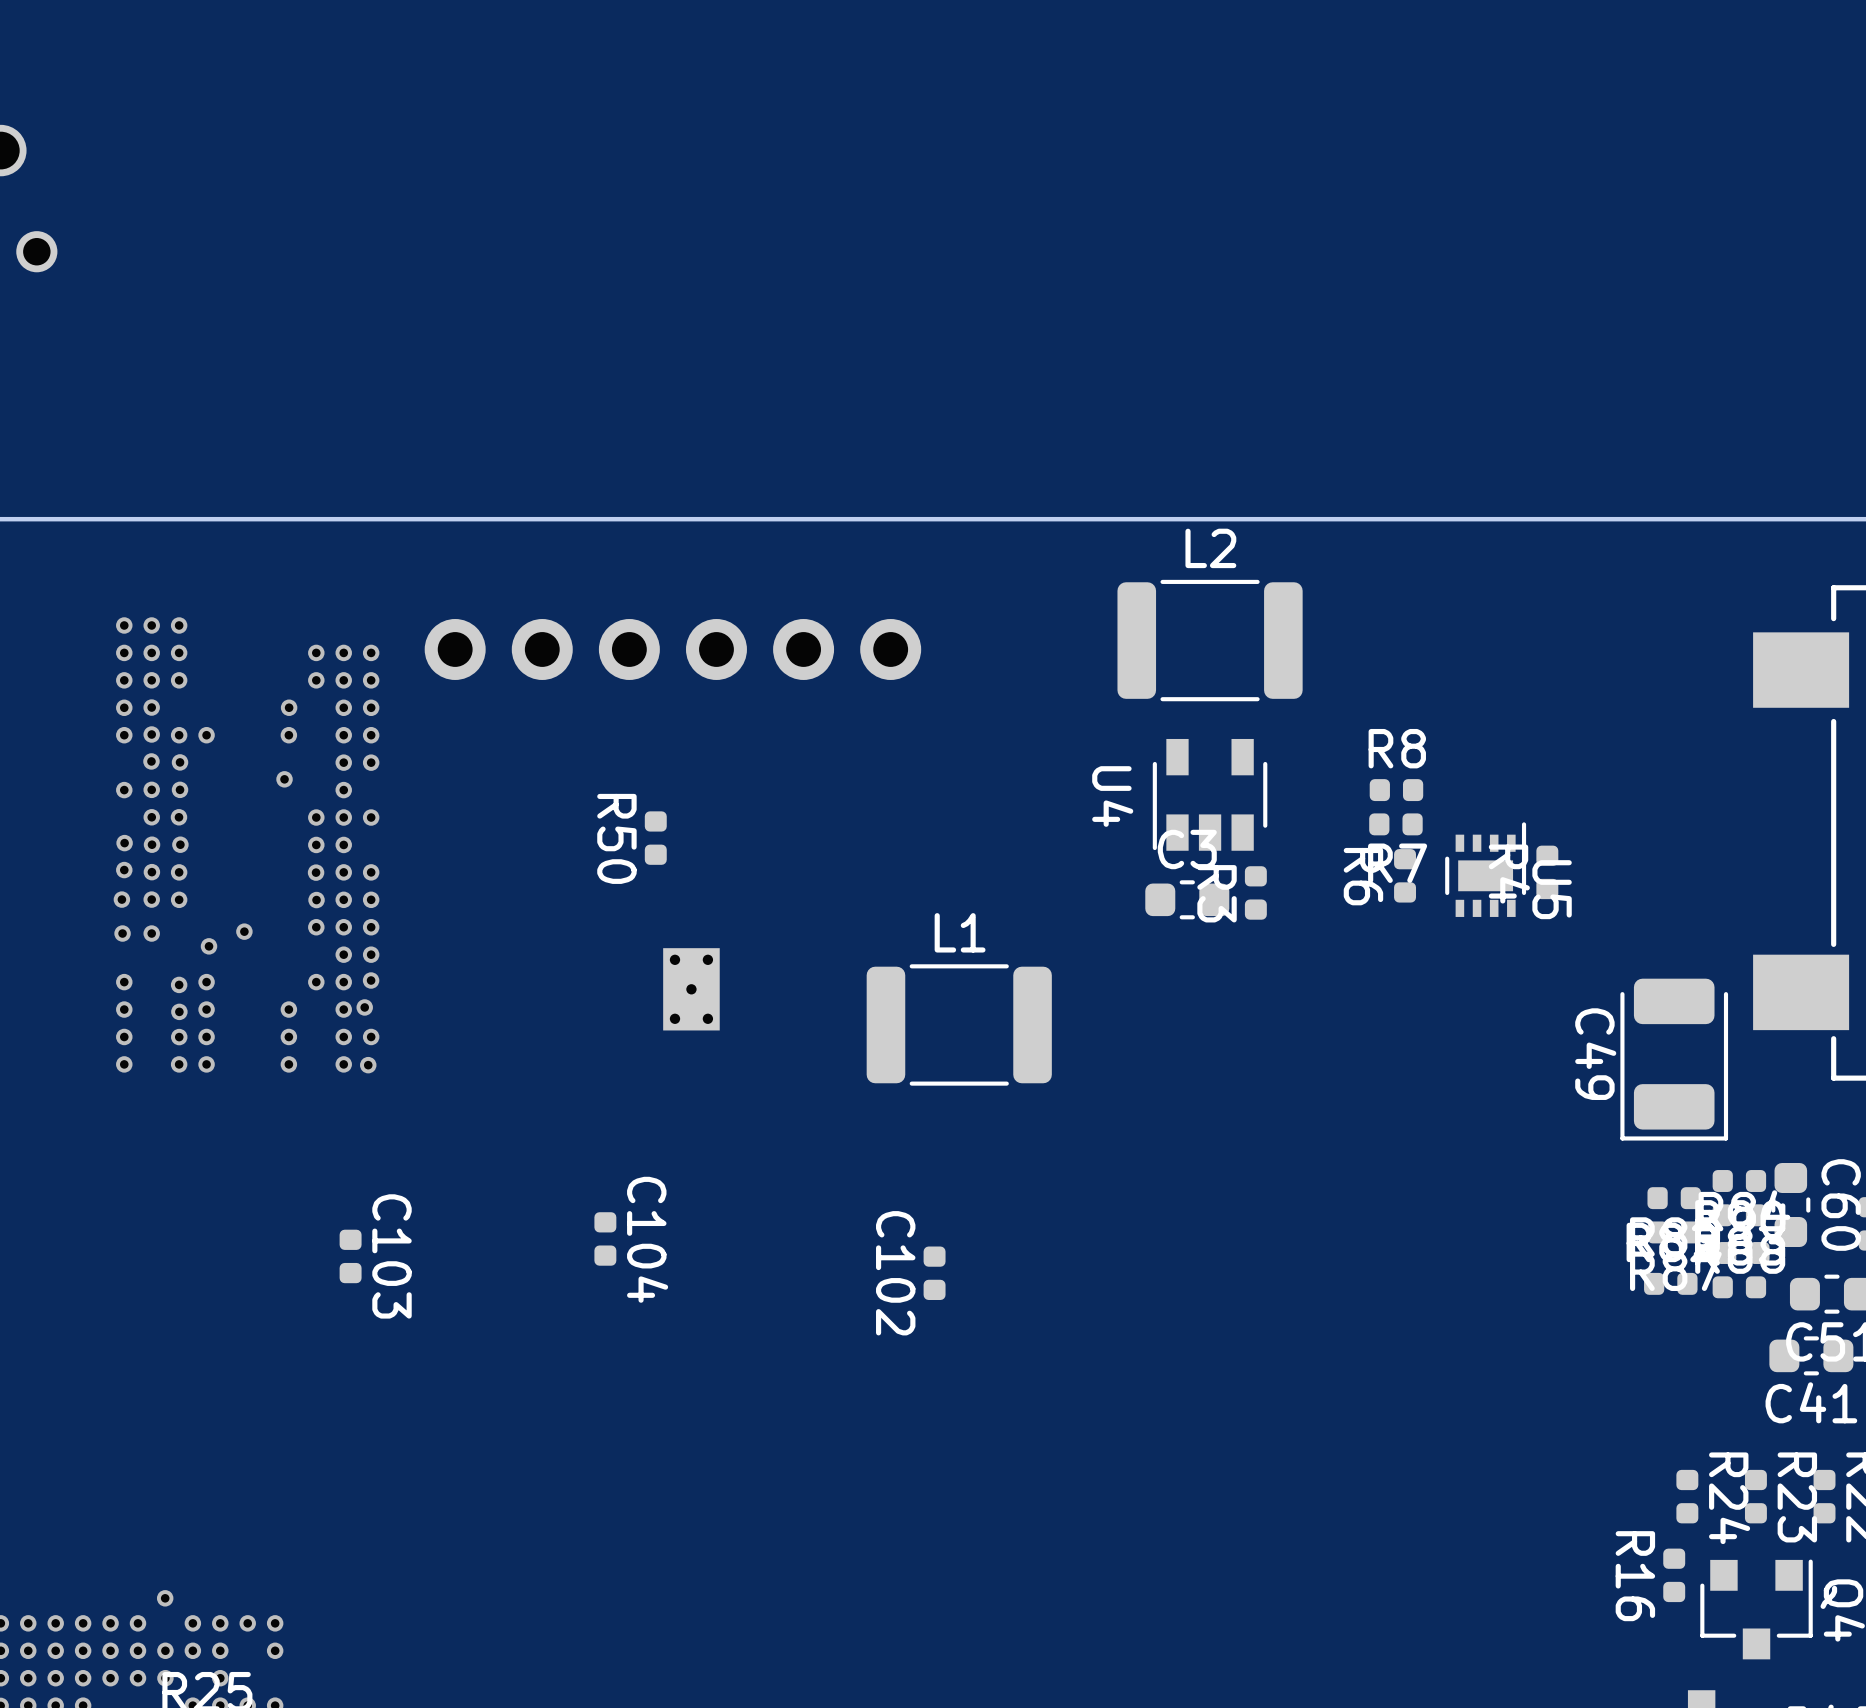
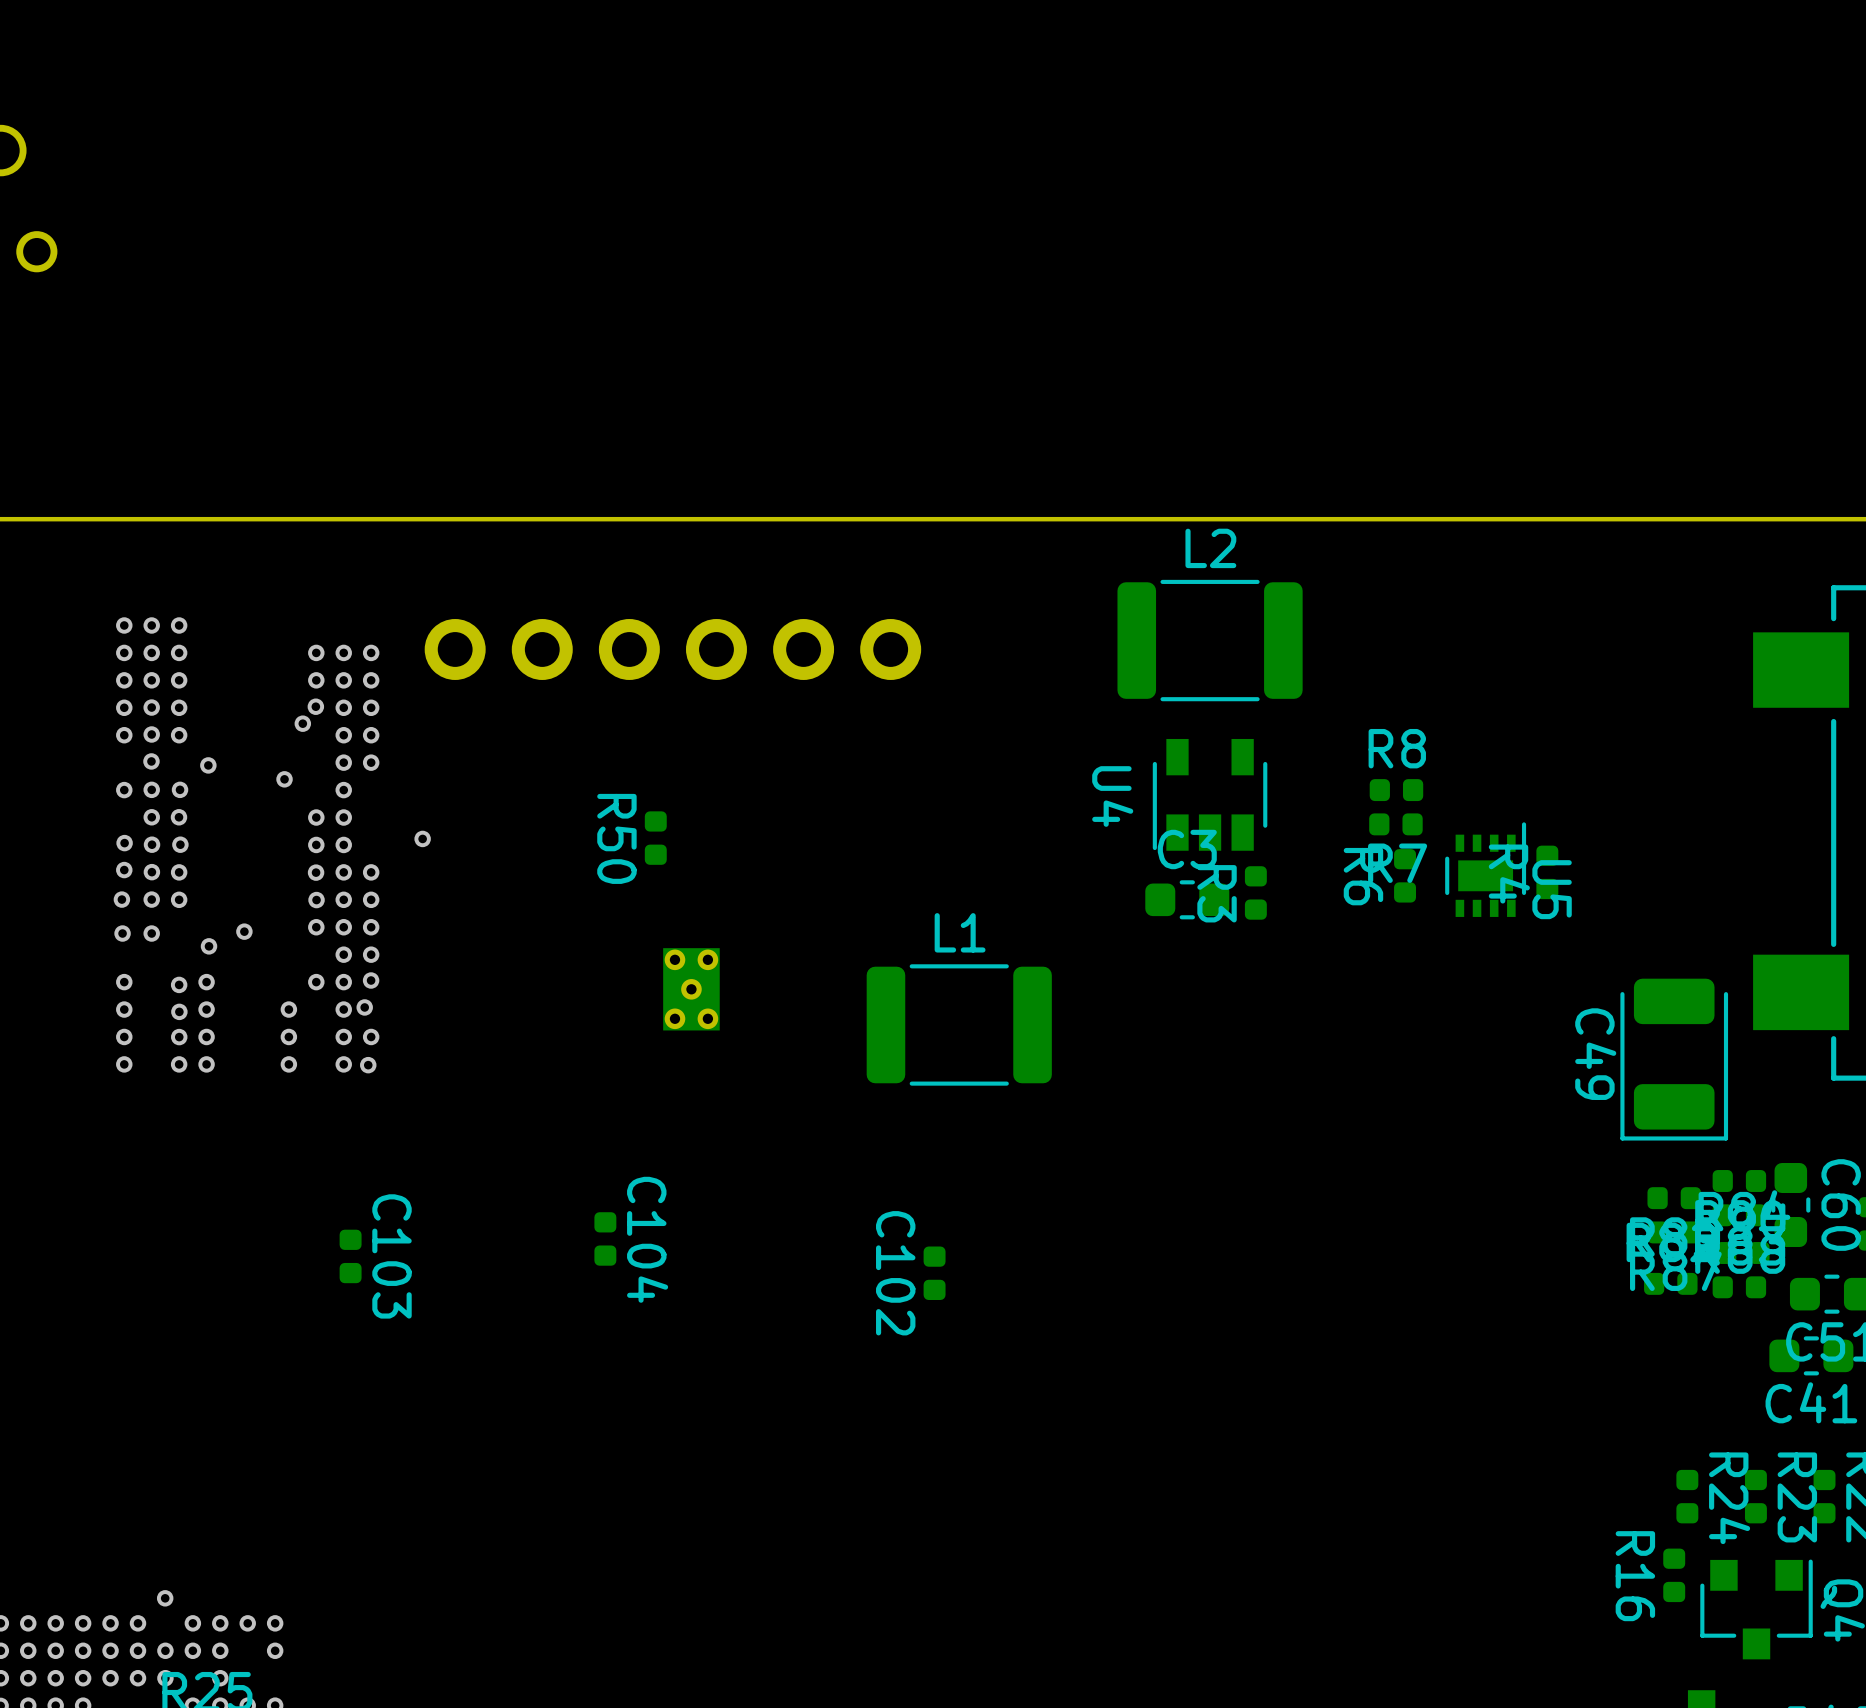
via: none -> (315, 706)
via: none -> (179, 707)
via: (289, 707) -> none
via: none -> (302, 723)
via: (206, 735) -> none
via: (288, 735) -> none
via: (180, 762) -> none
via: none -> (208, 765)
via position: (371, 817) -> (422, 838)

